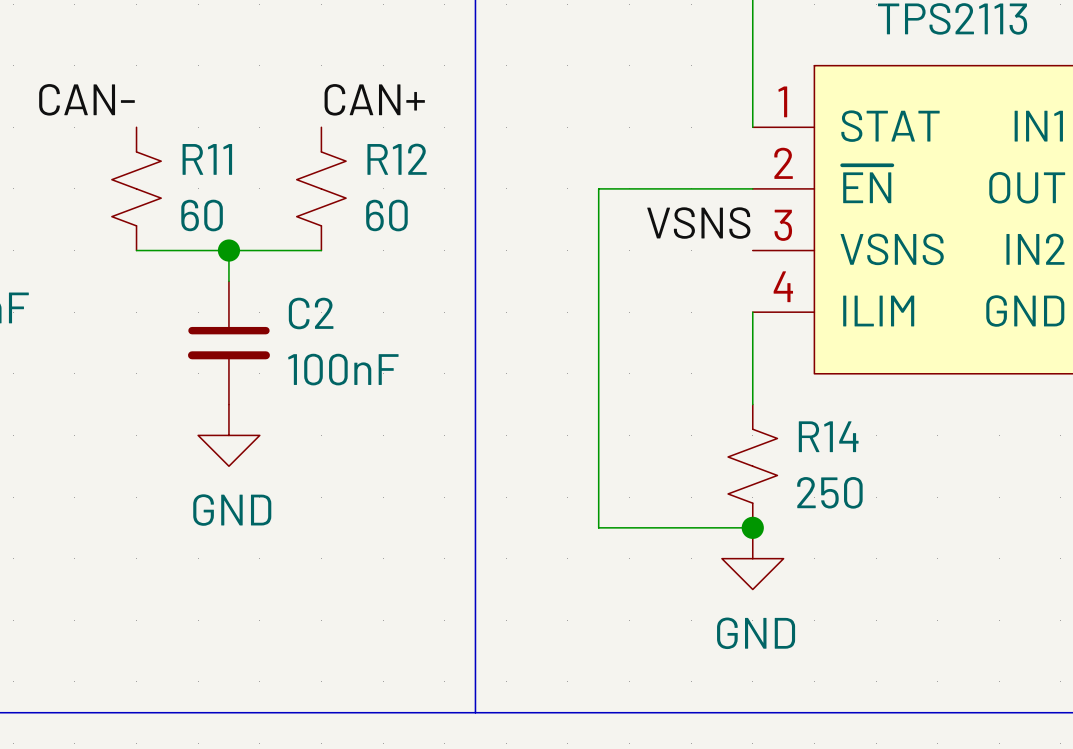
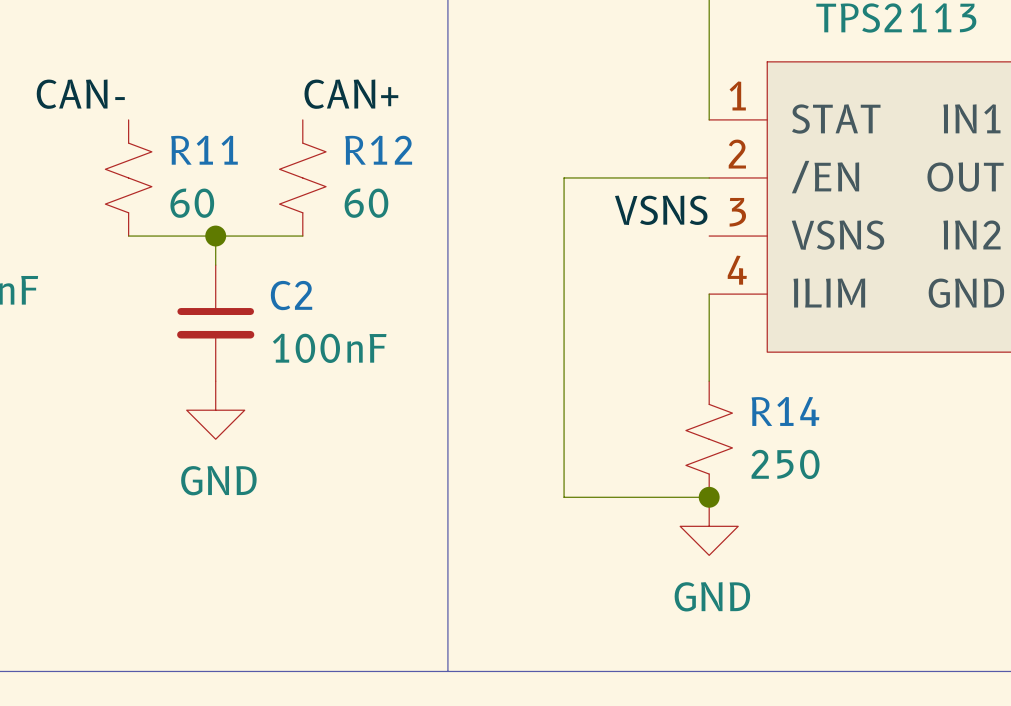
part pin name: ~{EN} (867, 184) -> /EN (825, 177)

